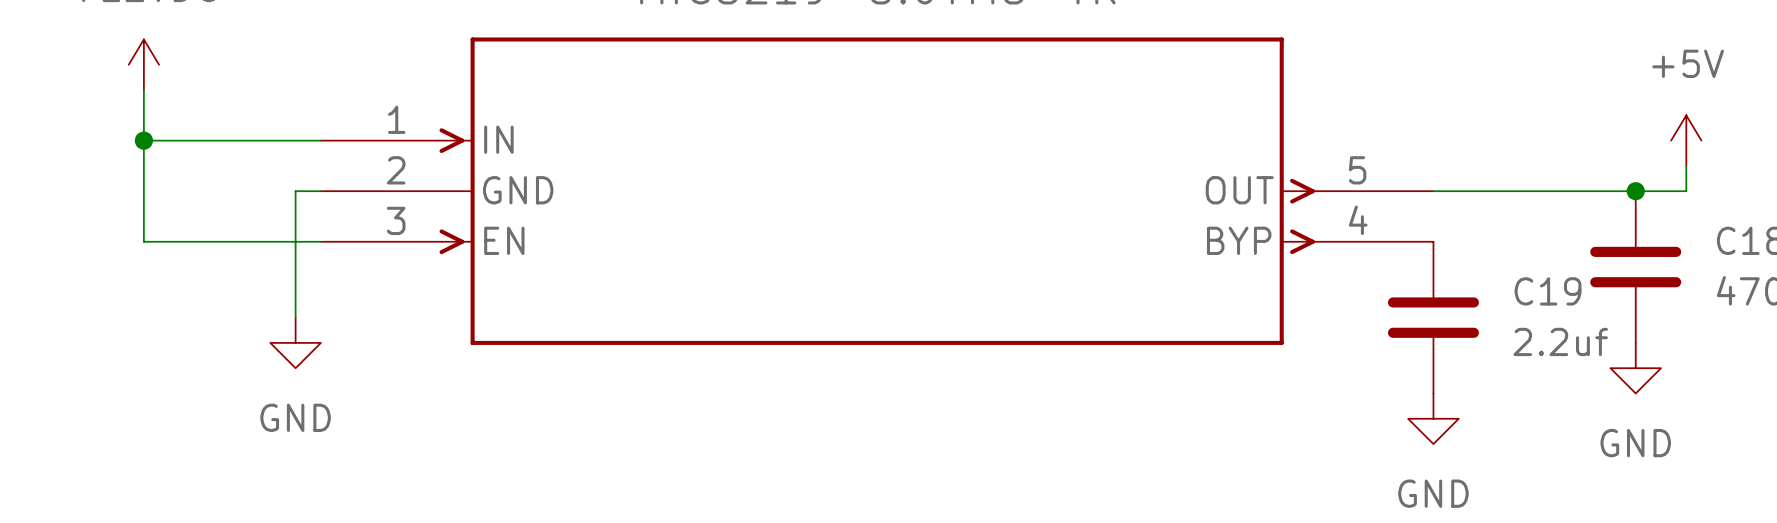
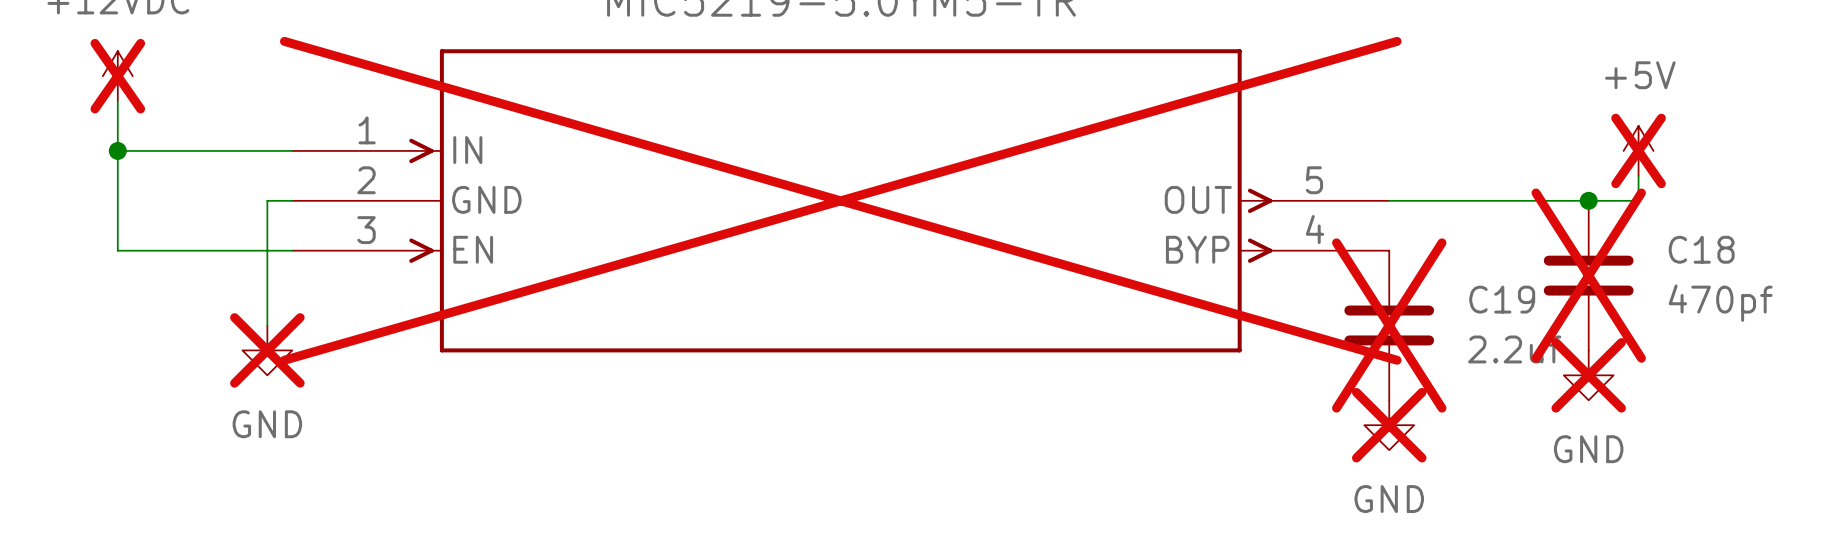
power symbol do-not-place cross: none -> (117, 76)
power symbol do-not-place cross: none -> (1638, 150)
part do-not-place cross: none -> (840, 200)
C18 do-not-place cross: none -> (1588, 275)
C19 do-not-place cross: none -> (1389, 325)
power symbol do-not-place cross: none -> (267, 350)
power symbol do-not-place cross: none -> (1588, 375)
power symbol do-not-place cross: none -> (1389, 425)

